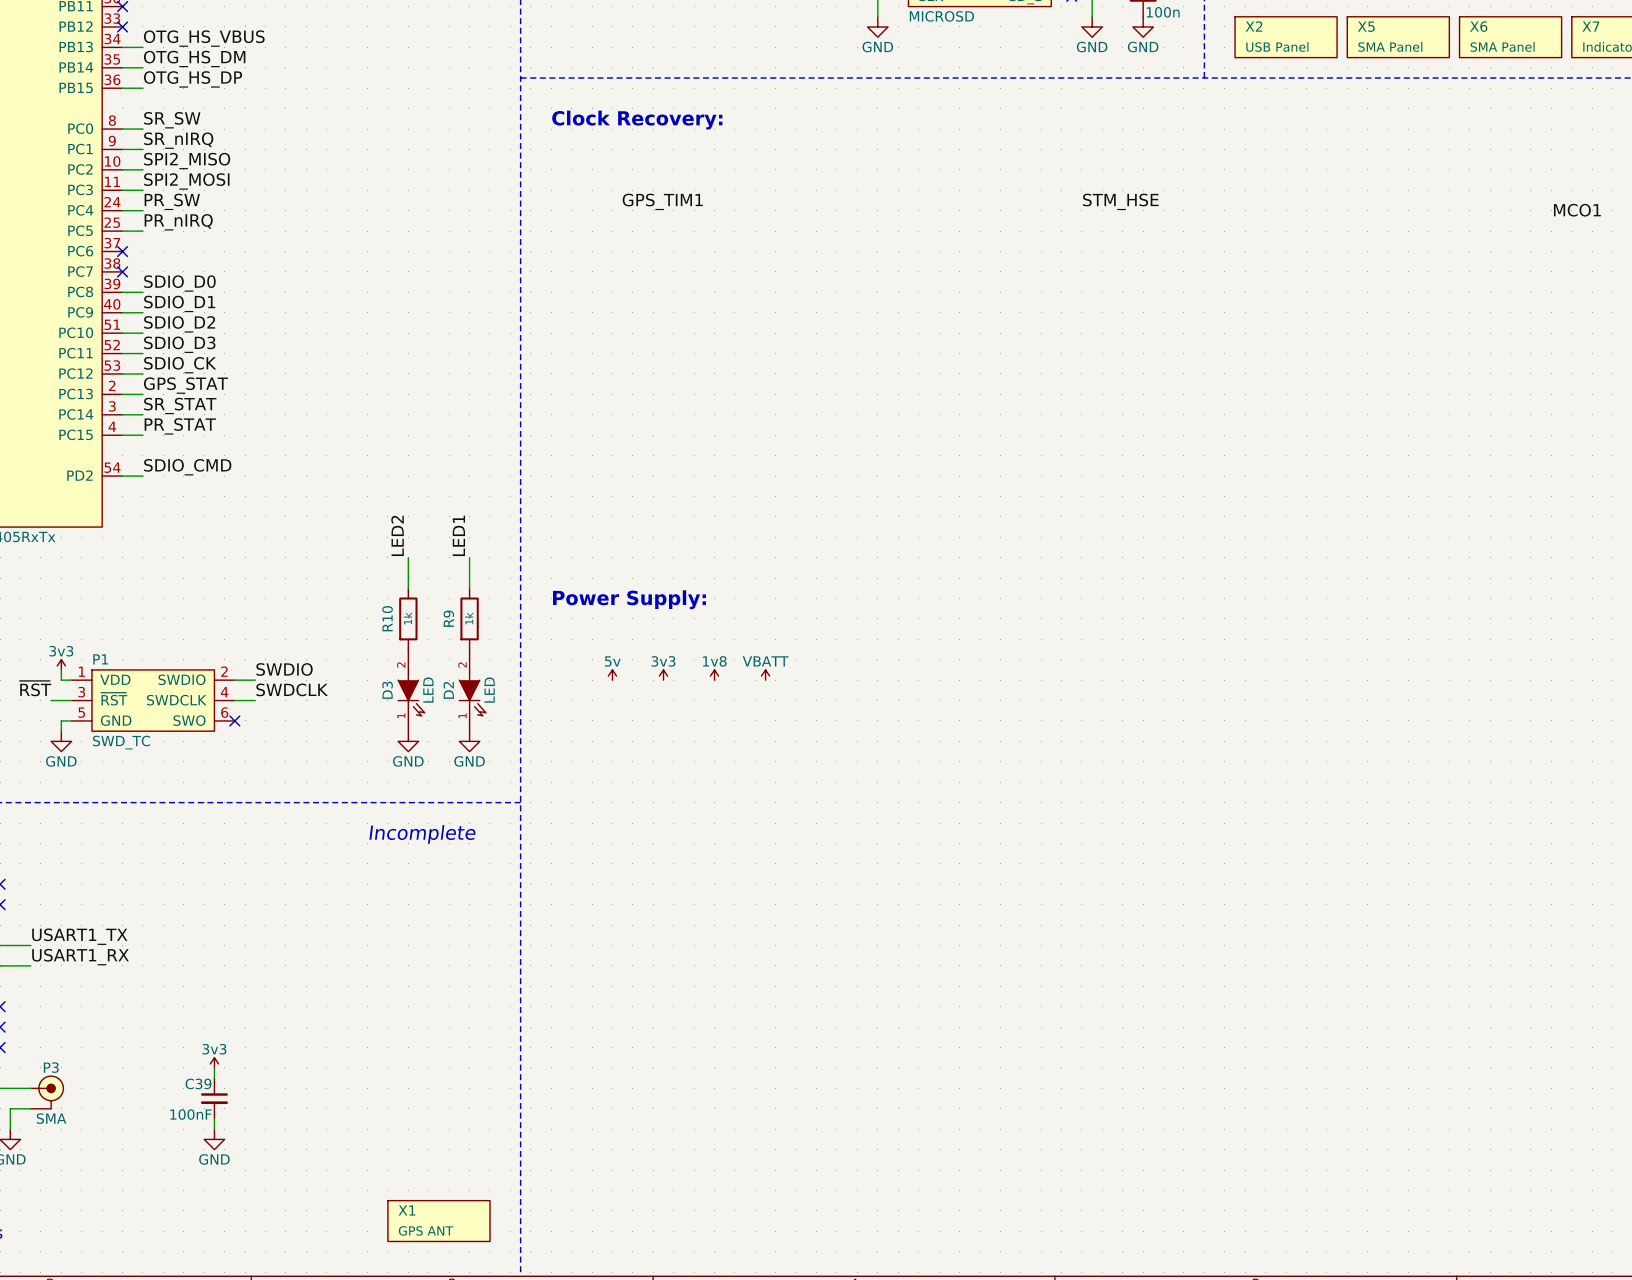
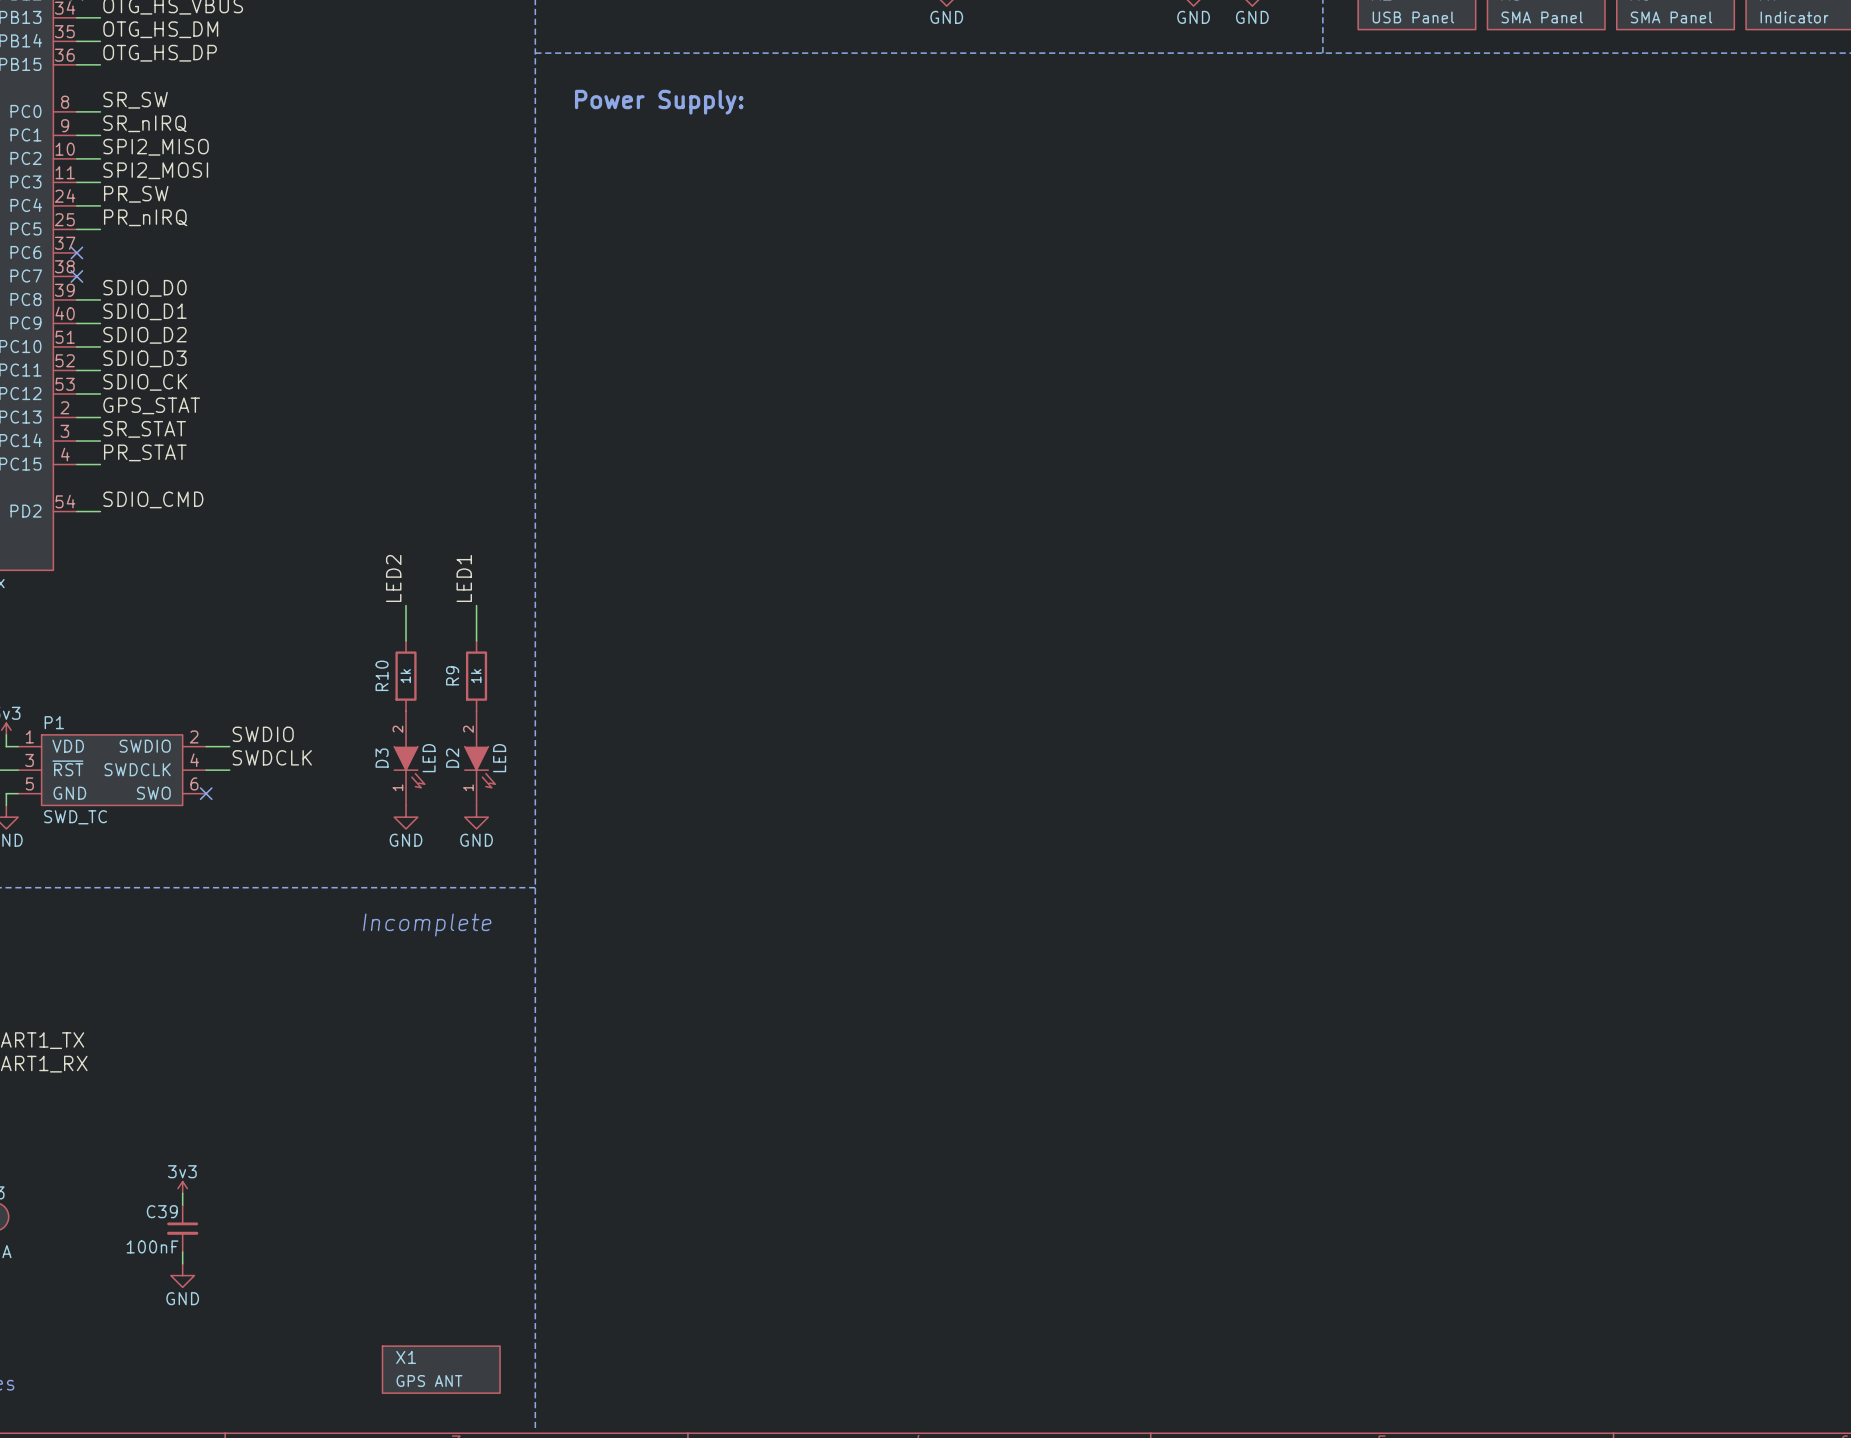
text: Clock Recovery: (637, 120) -> Power Supply: (659, 102)
label: GPS_TIM1 (662, 201) -> none
label: STM_HSE (1120, 201) -> none
label: MCO1 (1577, 210) -> none
text: Power Supply: (629, 599) -> none
power symbol: 5v (612, 675) -> none
power symbol: 3v3 (663, 675) -> none
power symbol: 1v8 (714, 675) -> none
power symbol: VBATT (765, 675) -> none

